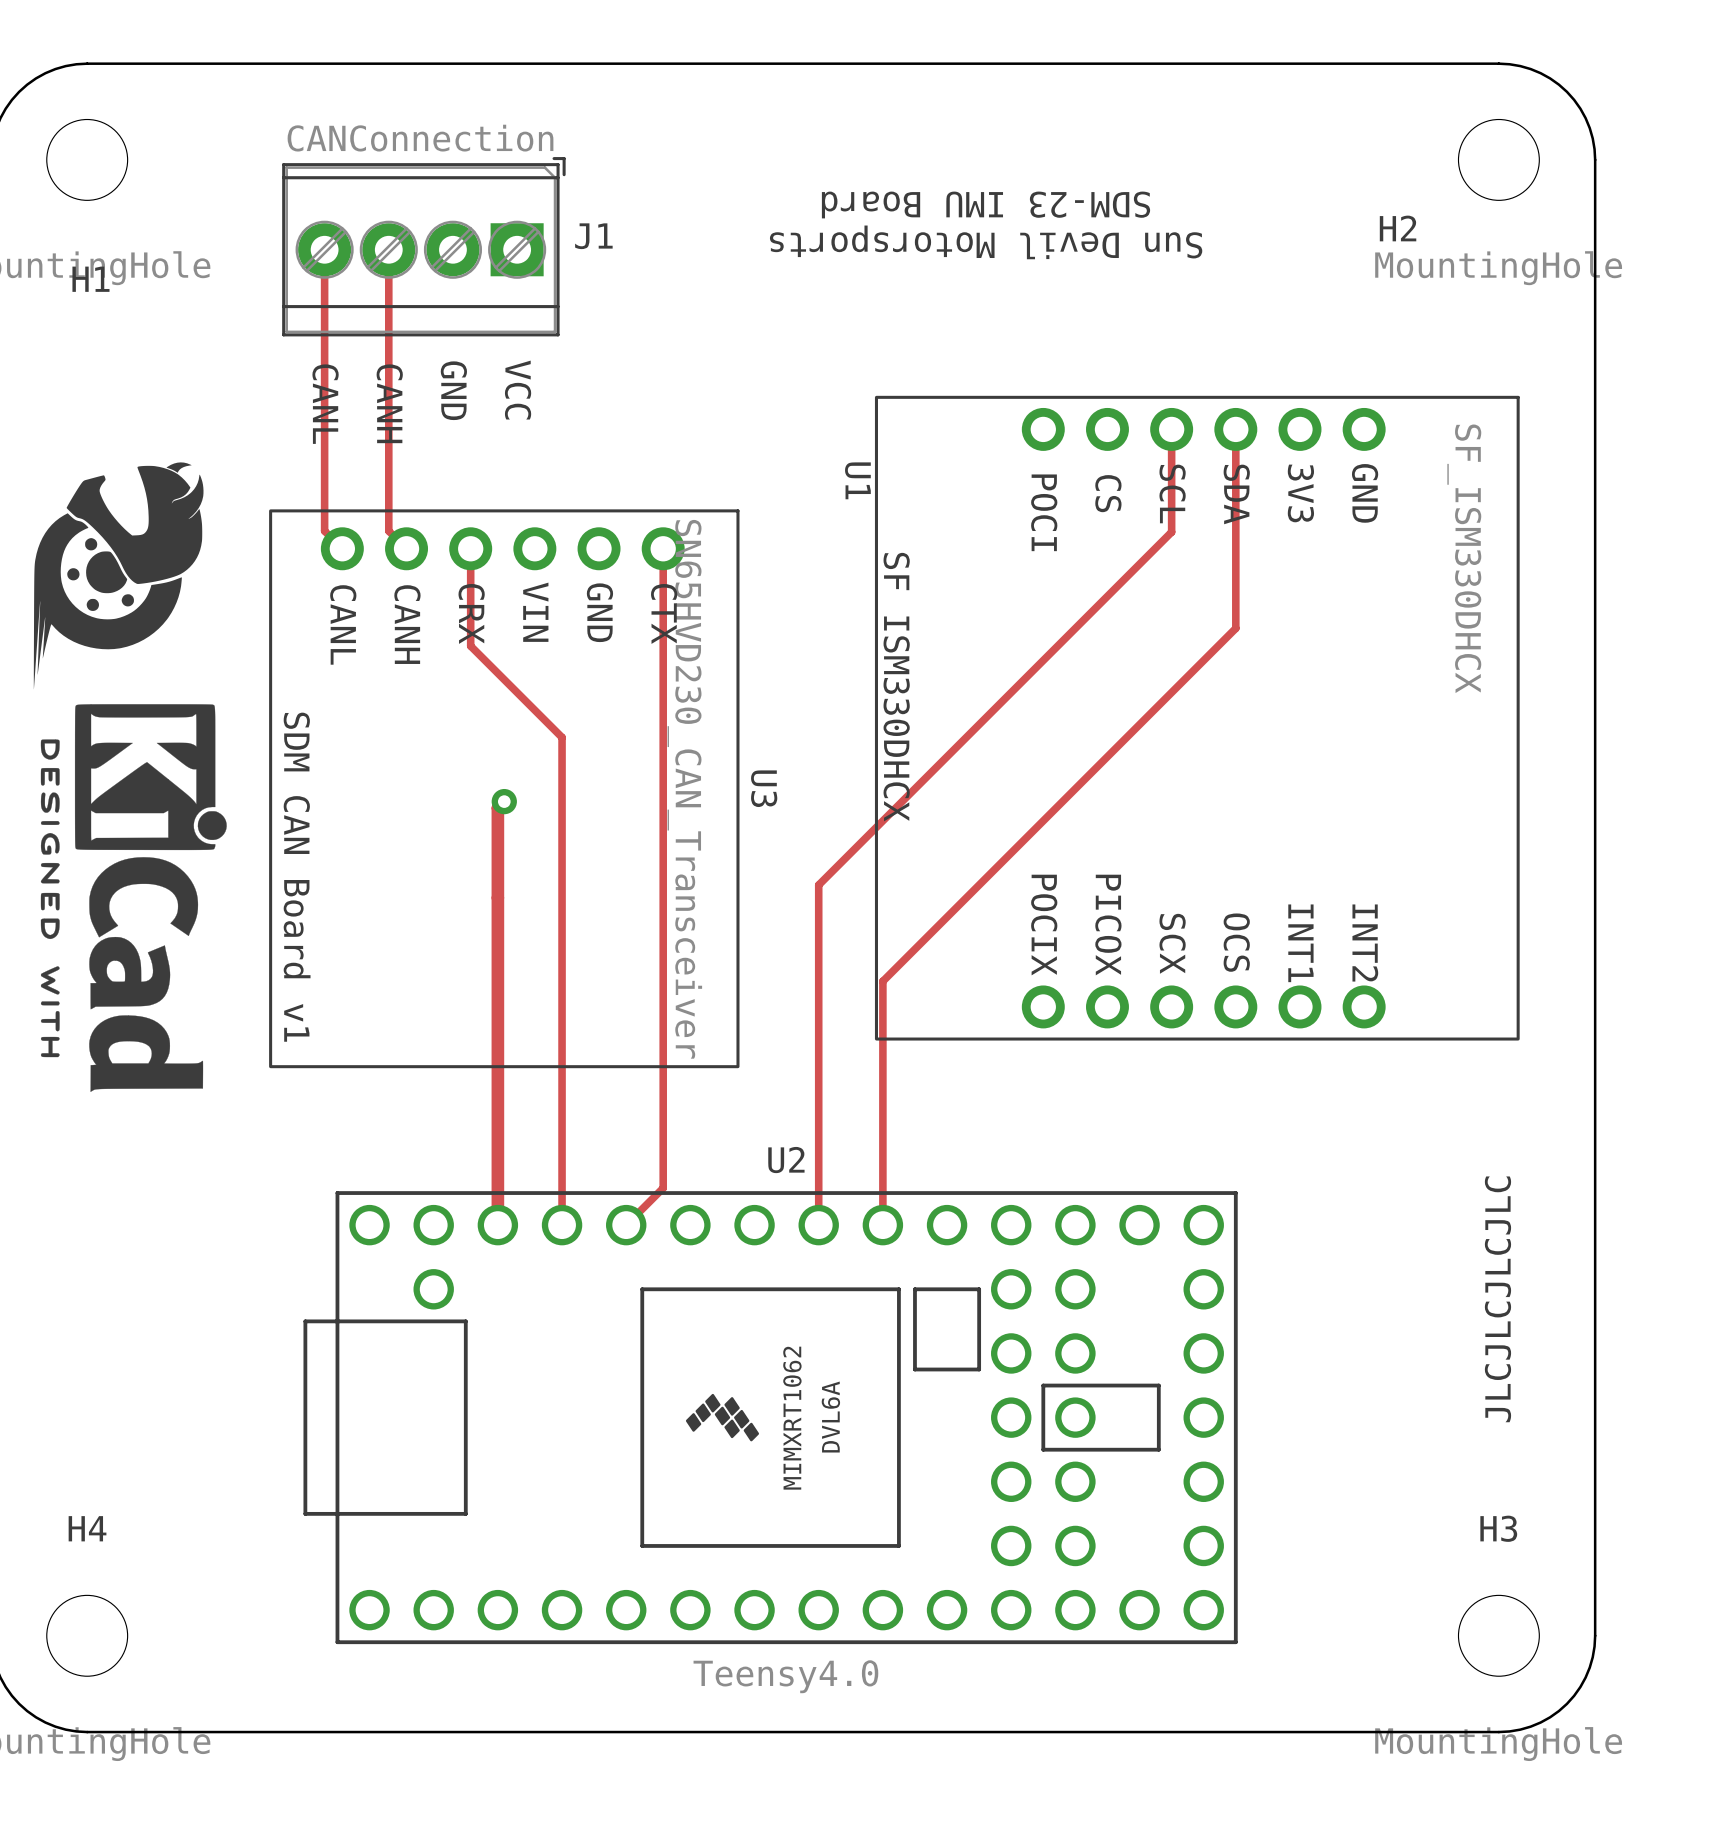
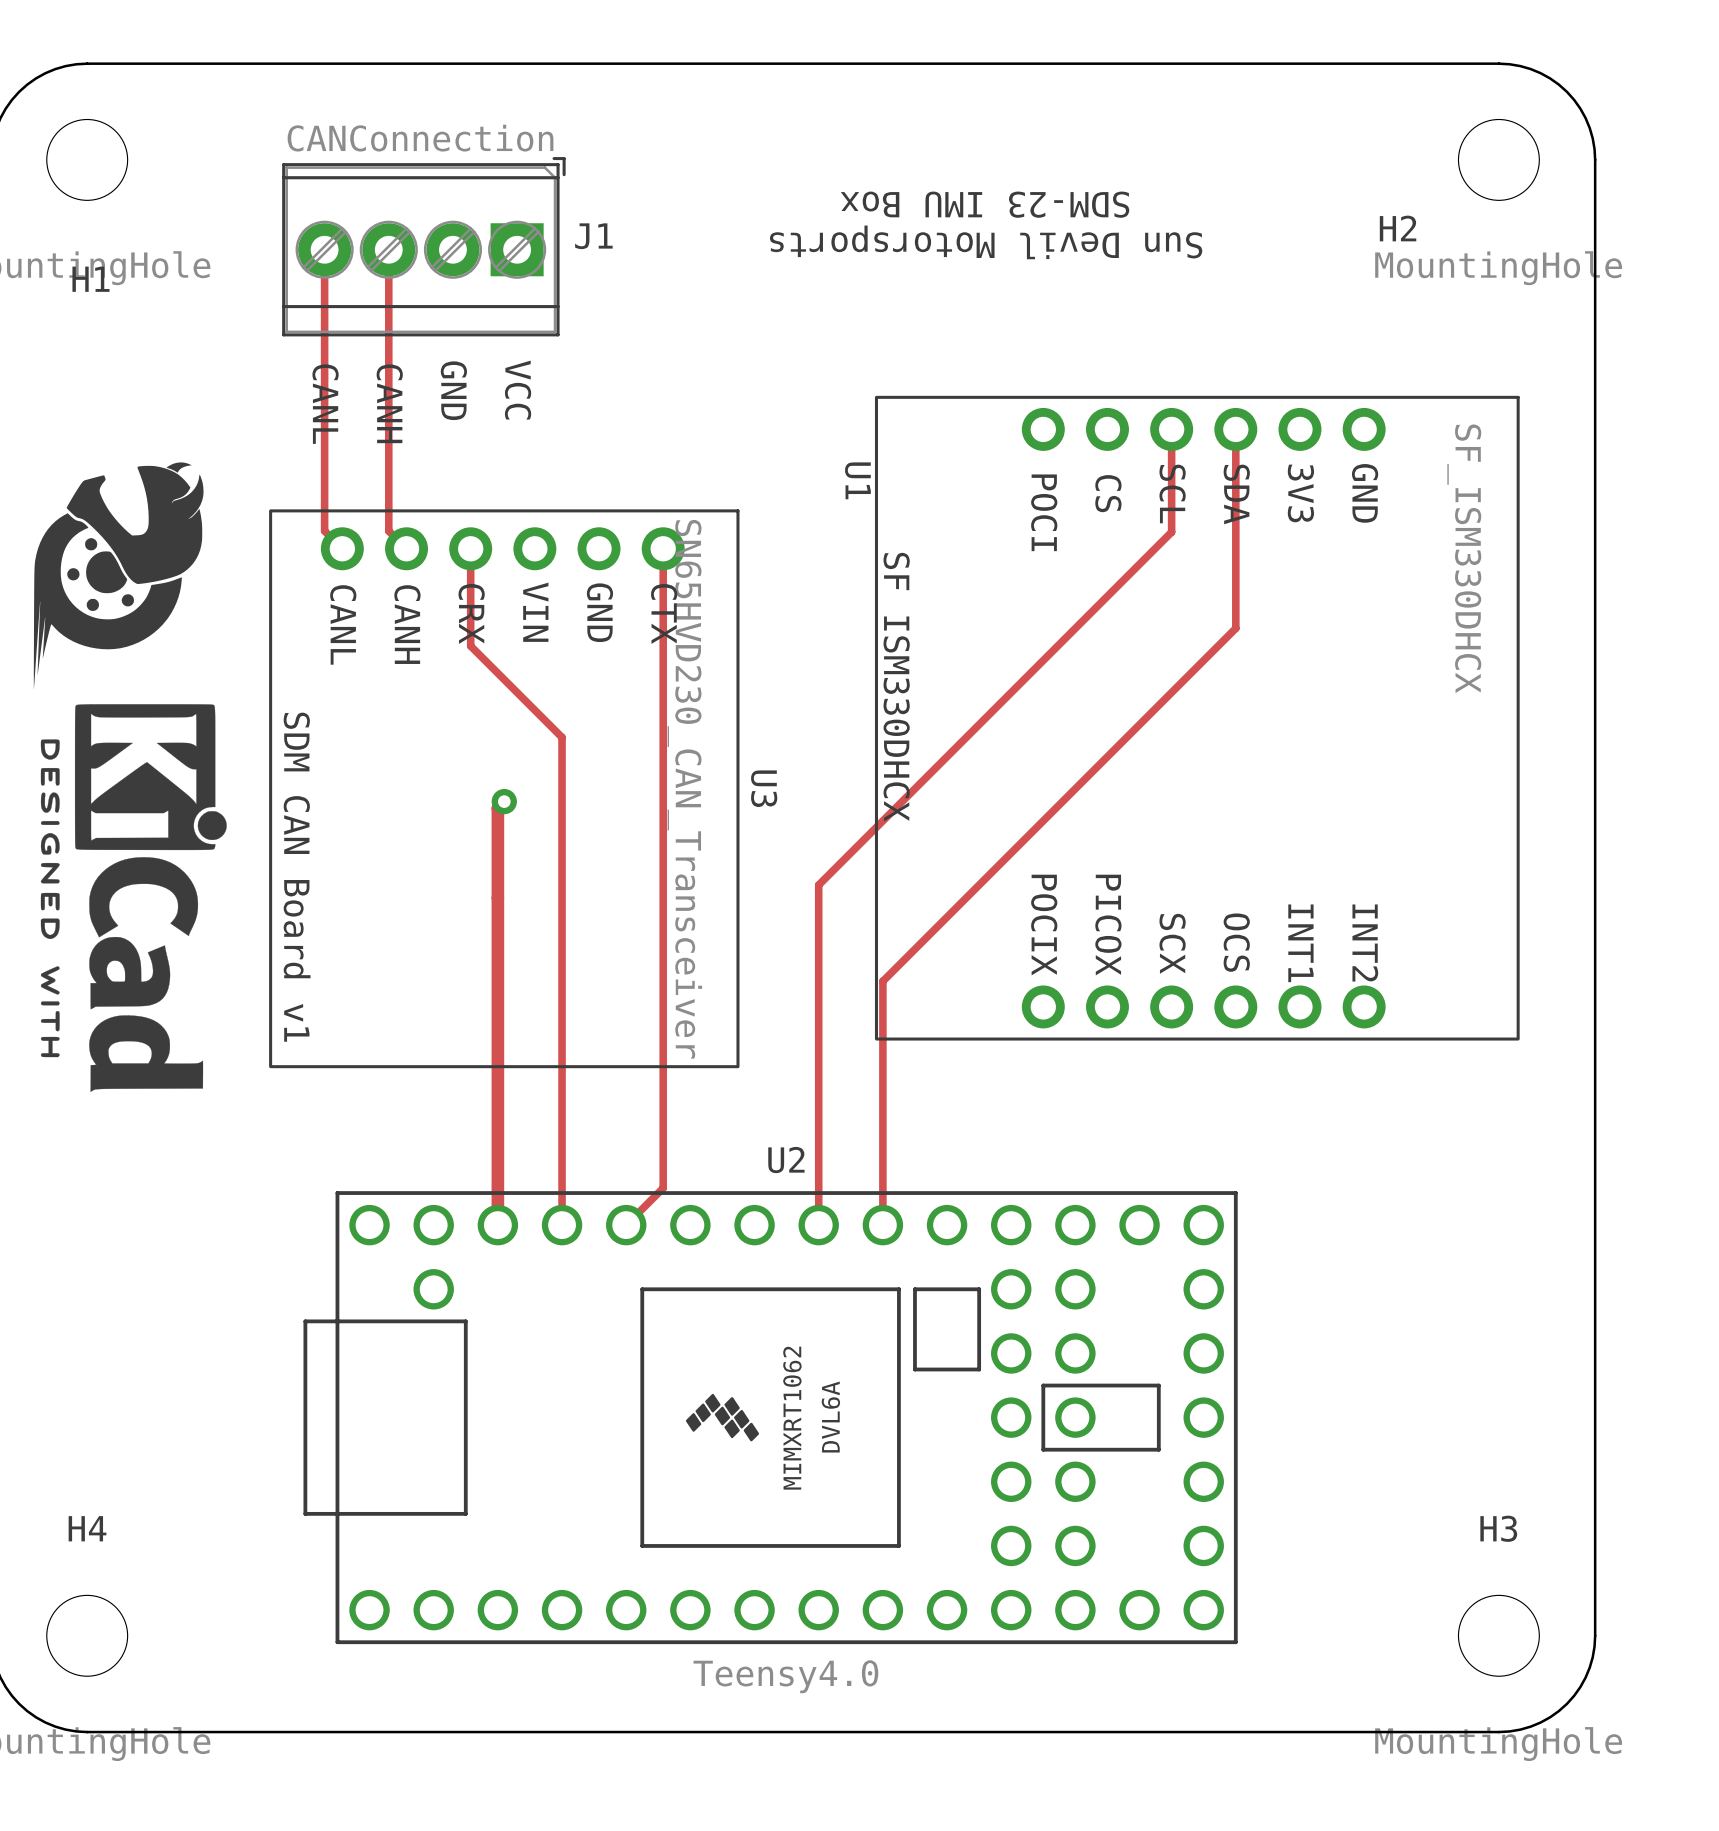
text: SDM-23 IMU Board (986, 204) -> SDM-23 IMU Box (985, 204)
text: JLCJLCJLCJLC (1497, 1299) -> none

